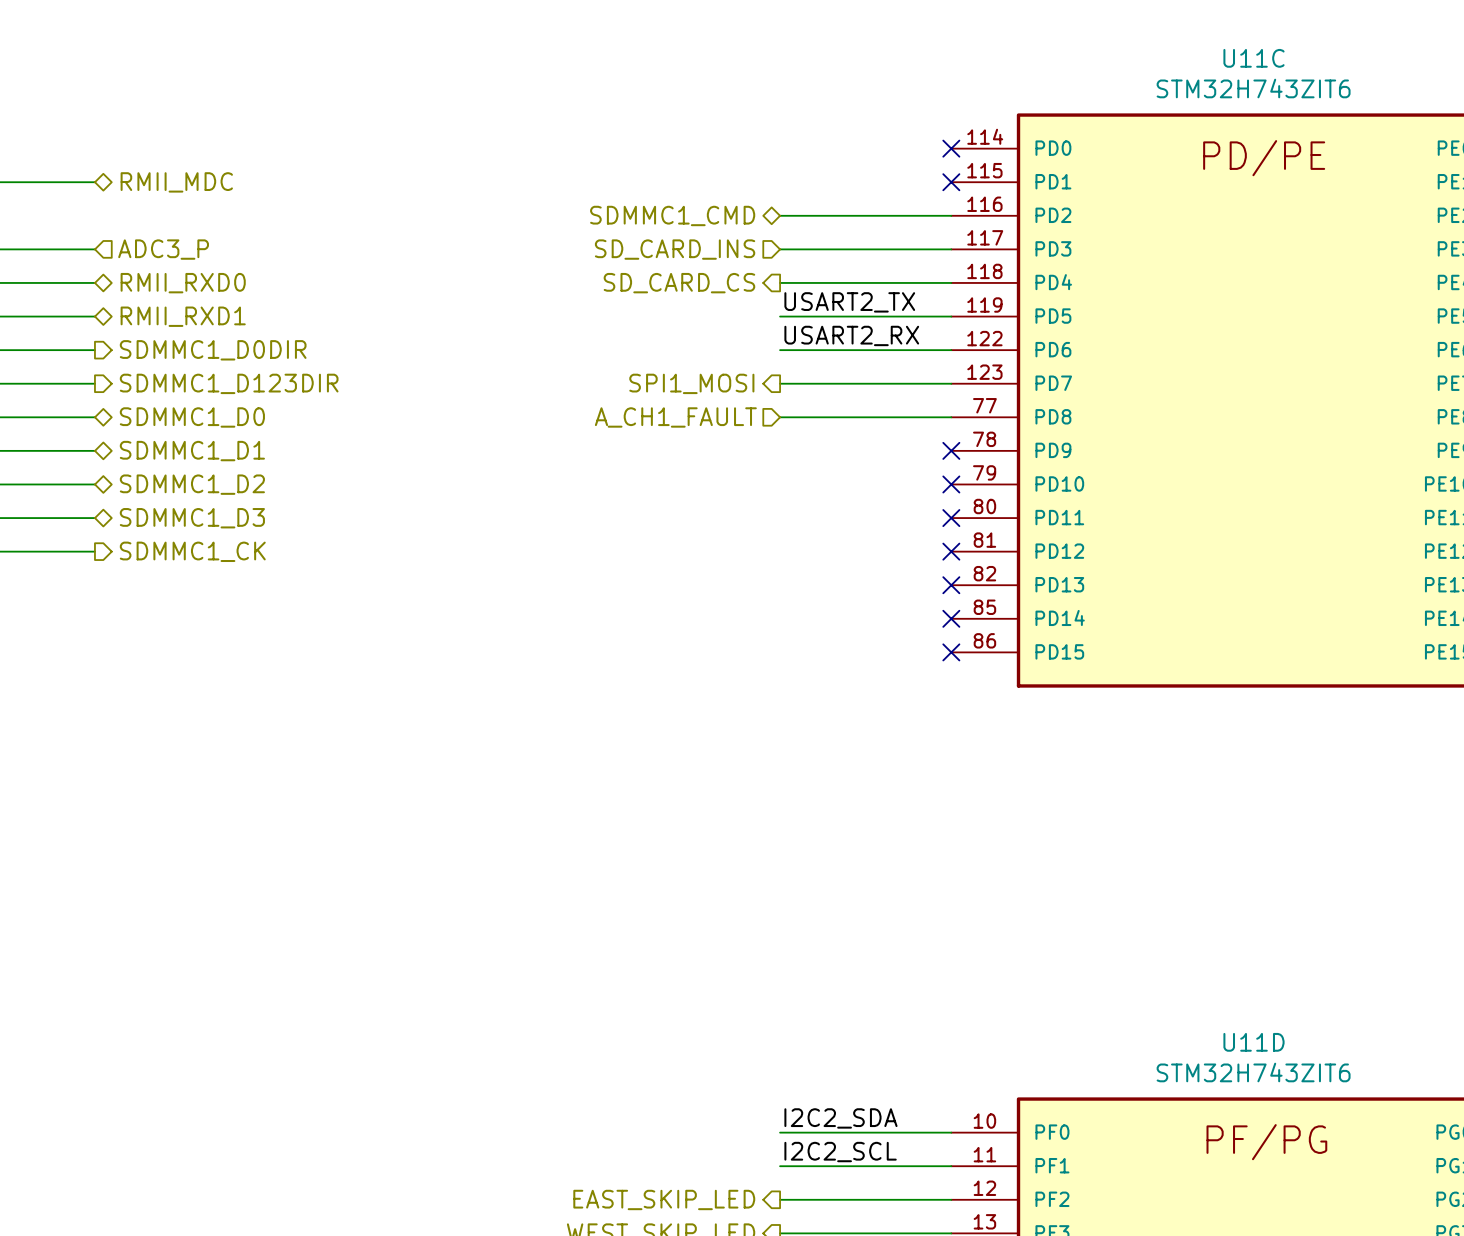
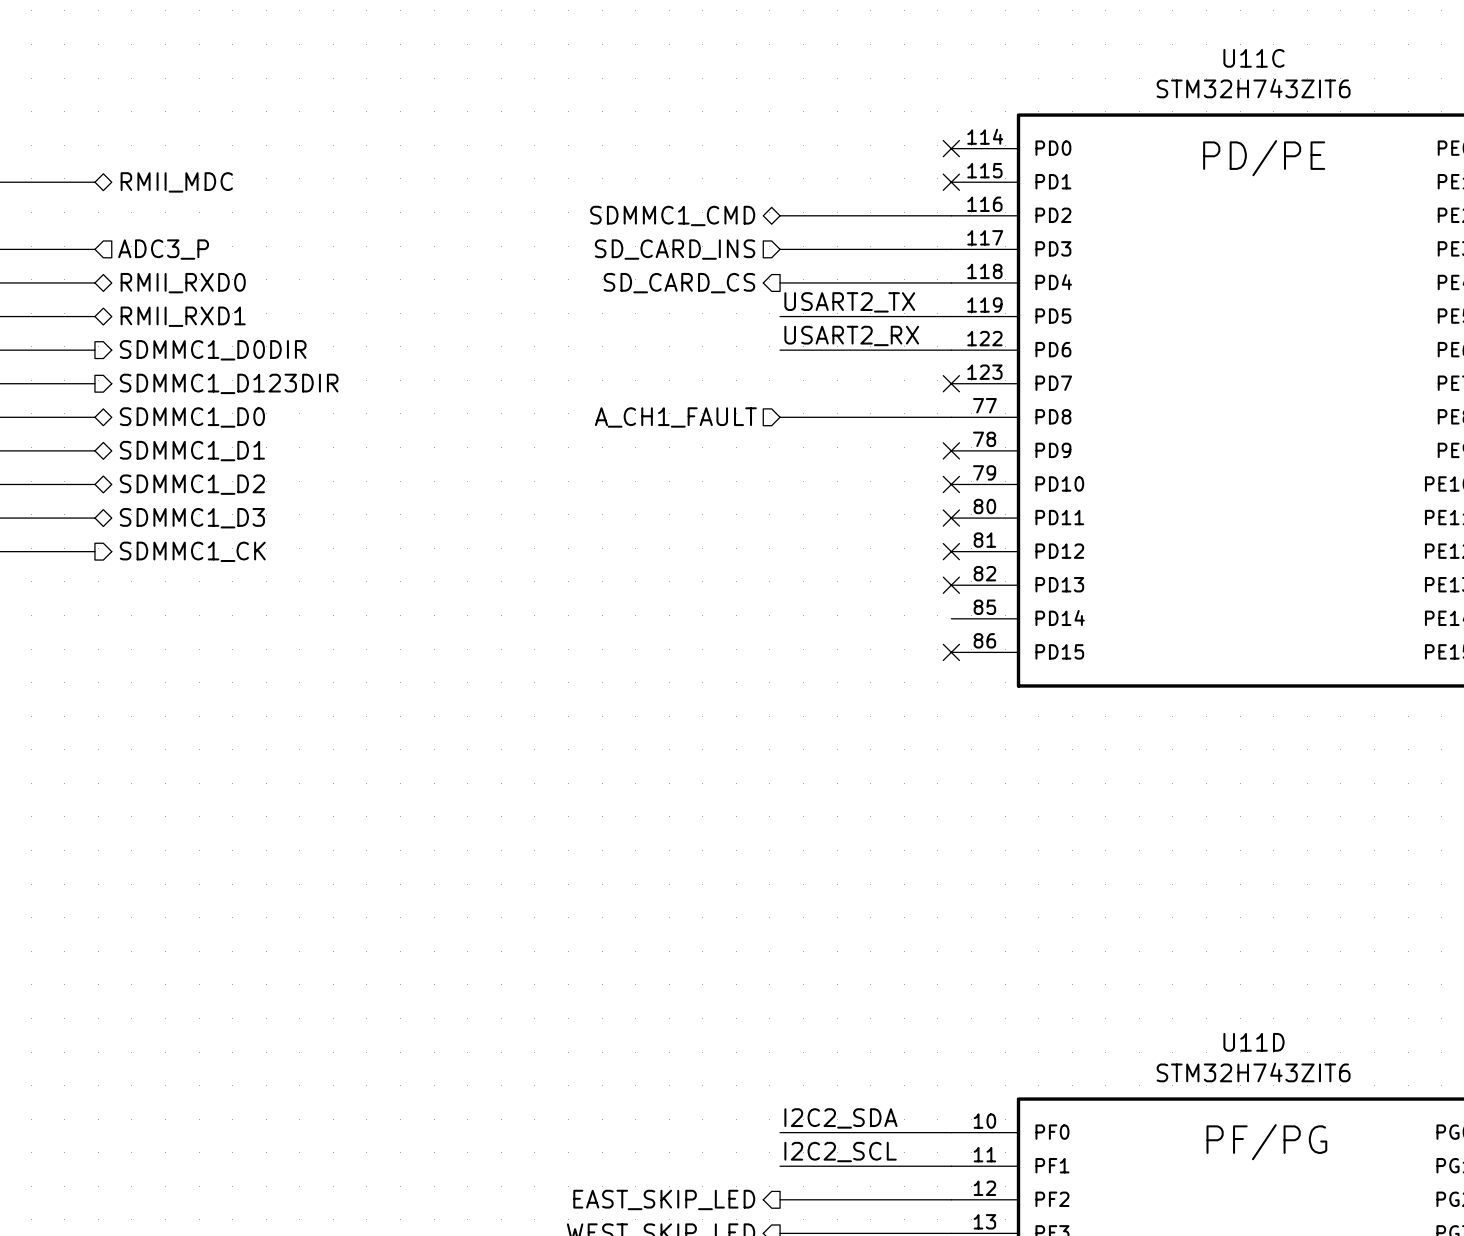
hierarchical label: SPI1_MOSI (691, 383) -> none
wire: (780, 383) (951, 383) -> none
no-connect mark: none -> (951, 383)
no-connect mark: (951, 618) -> none

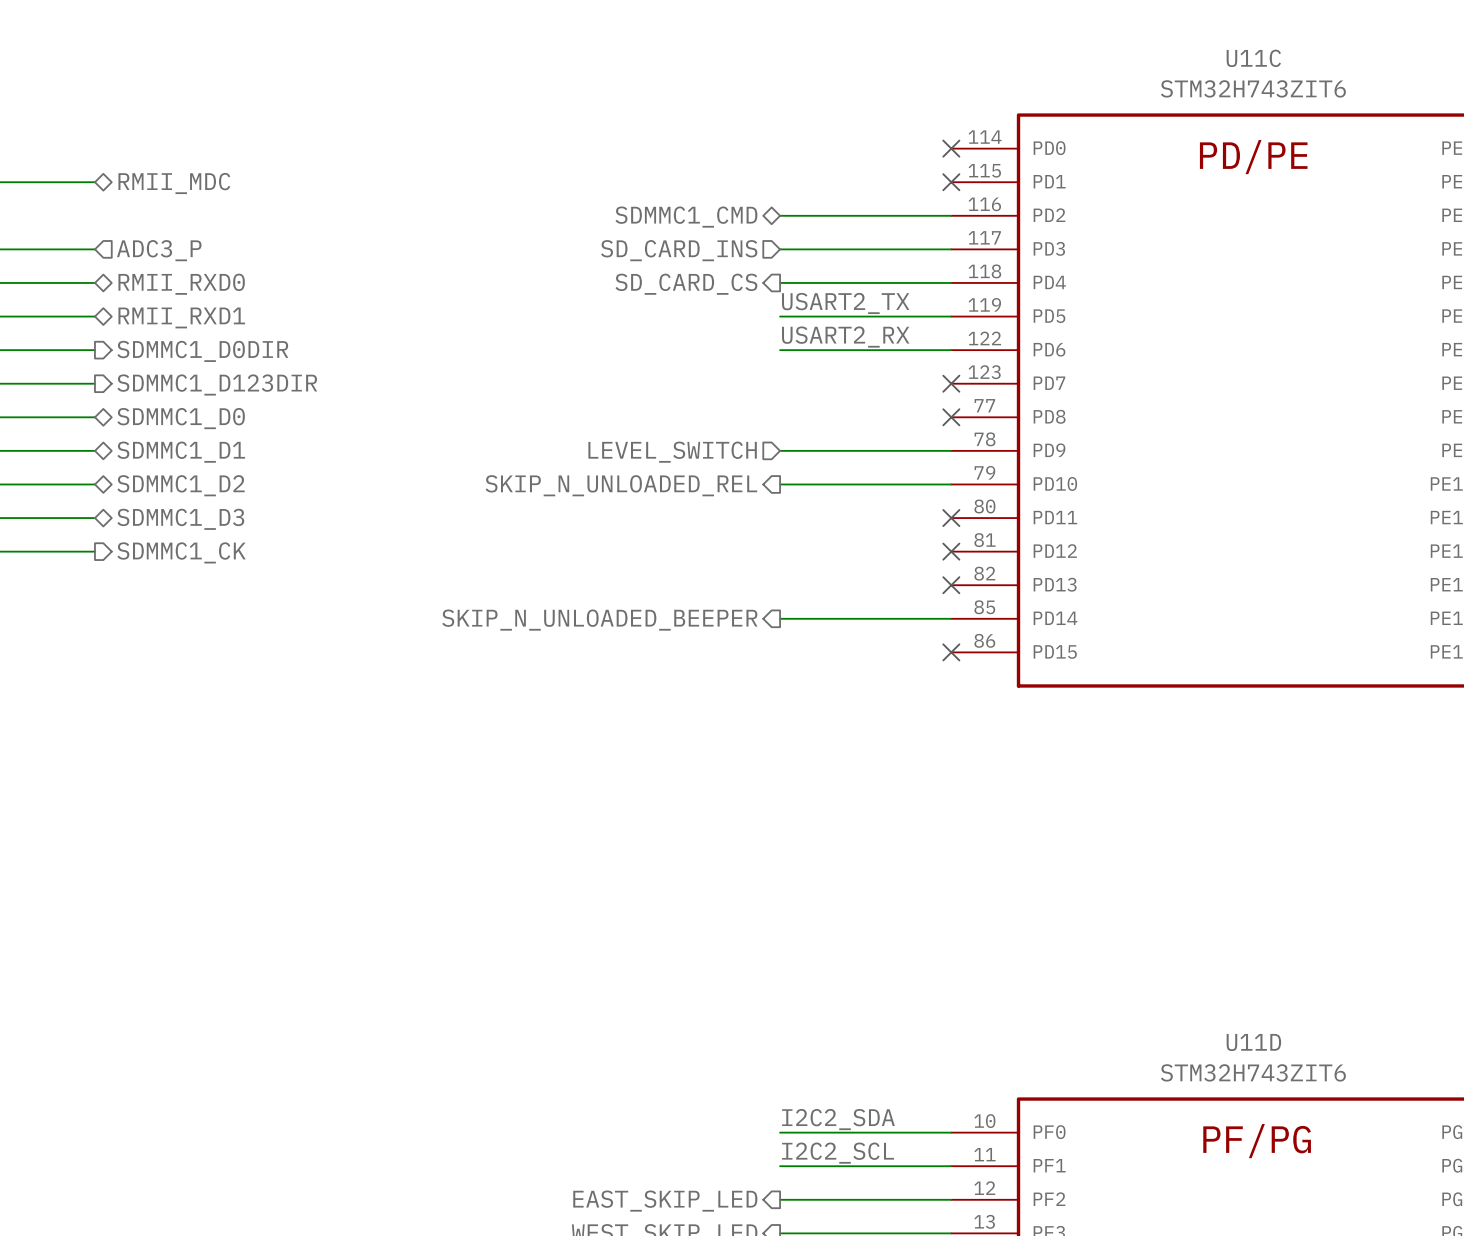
hierarchical label: A_CH1_FAULT (675, 417) -> none
wire: (780, 417) (951, 417) -> (780, 450) (951, 450)
no-connect mark: none -> (951, 417)
no-connect mark: (951, 450) -> none
hierarchical label: none -> LEVEL_SWITCH (672, 452)
hierarchical label: none -> SKIP_N_UNLOADED_REL (621, 485)
wire: none -> (780, 484) (951, 484)
no-connect mark: (951, 484) -> none
hierarchical label: none -> SKIP_N_UNLOADED_BEEPER (599, 620)
wire: none -> (780, 618) (951, 618)

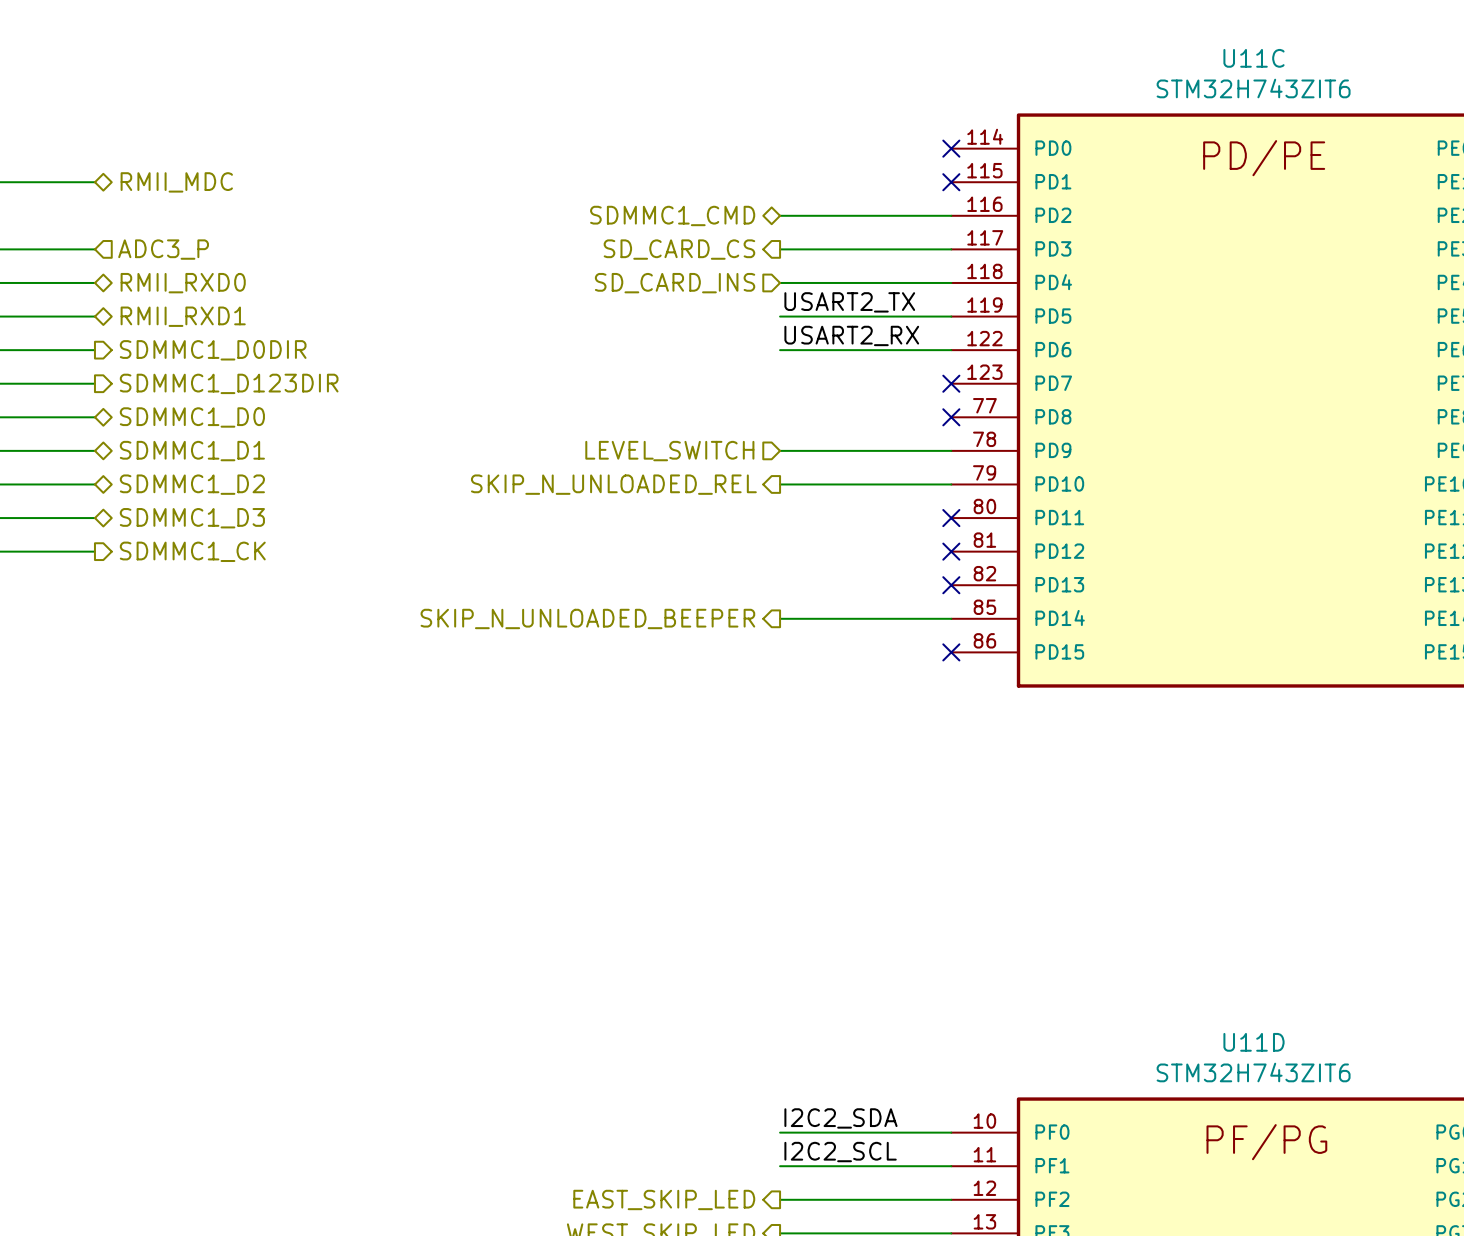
hierarchical label shape: input (679, 250) -> output (679, 249)
hierarchical label: SD_CARD_INS (679, 250) -> SD_CARD_CS (679, 249)
hierarchical label shape: output (686, 284) -> input (675, 283)
hierarchical label: SD_CARD_CS (686, 284) -> SD_CARD_INS (675, 283)

